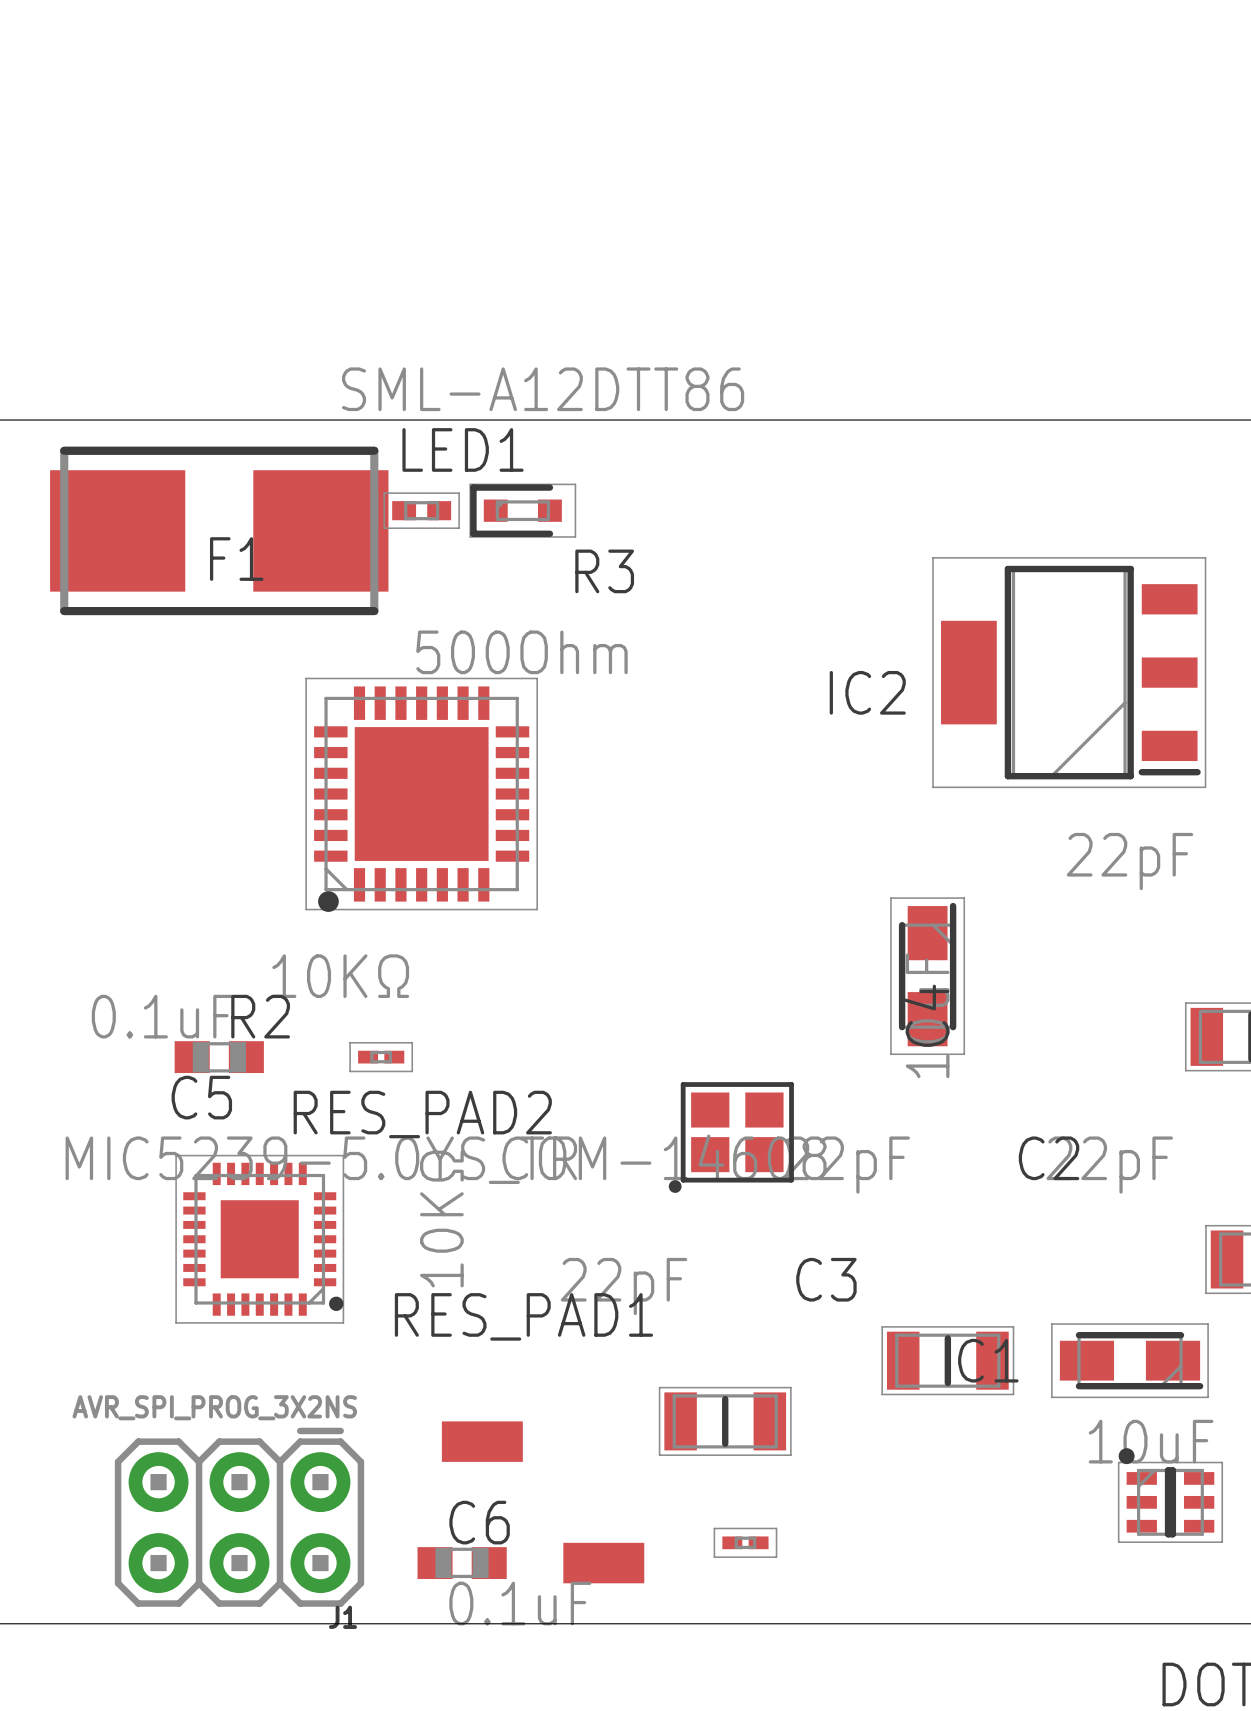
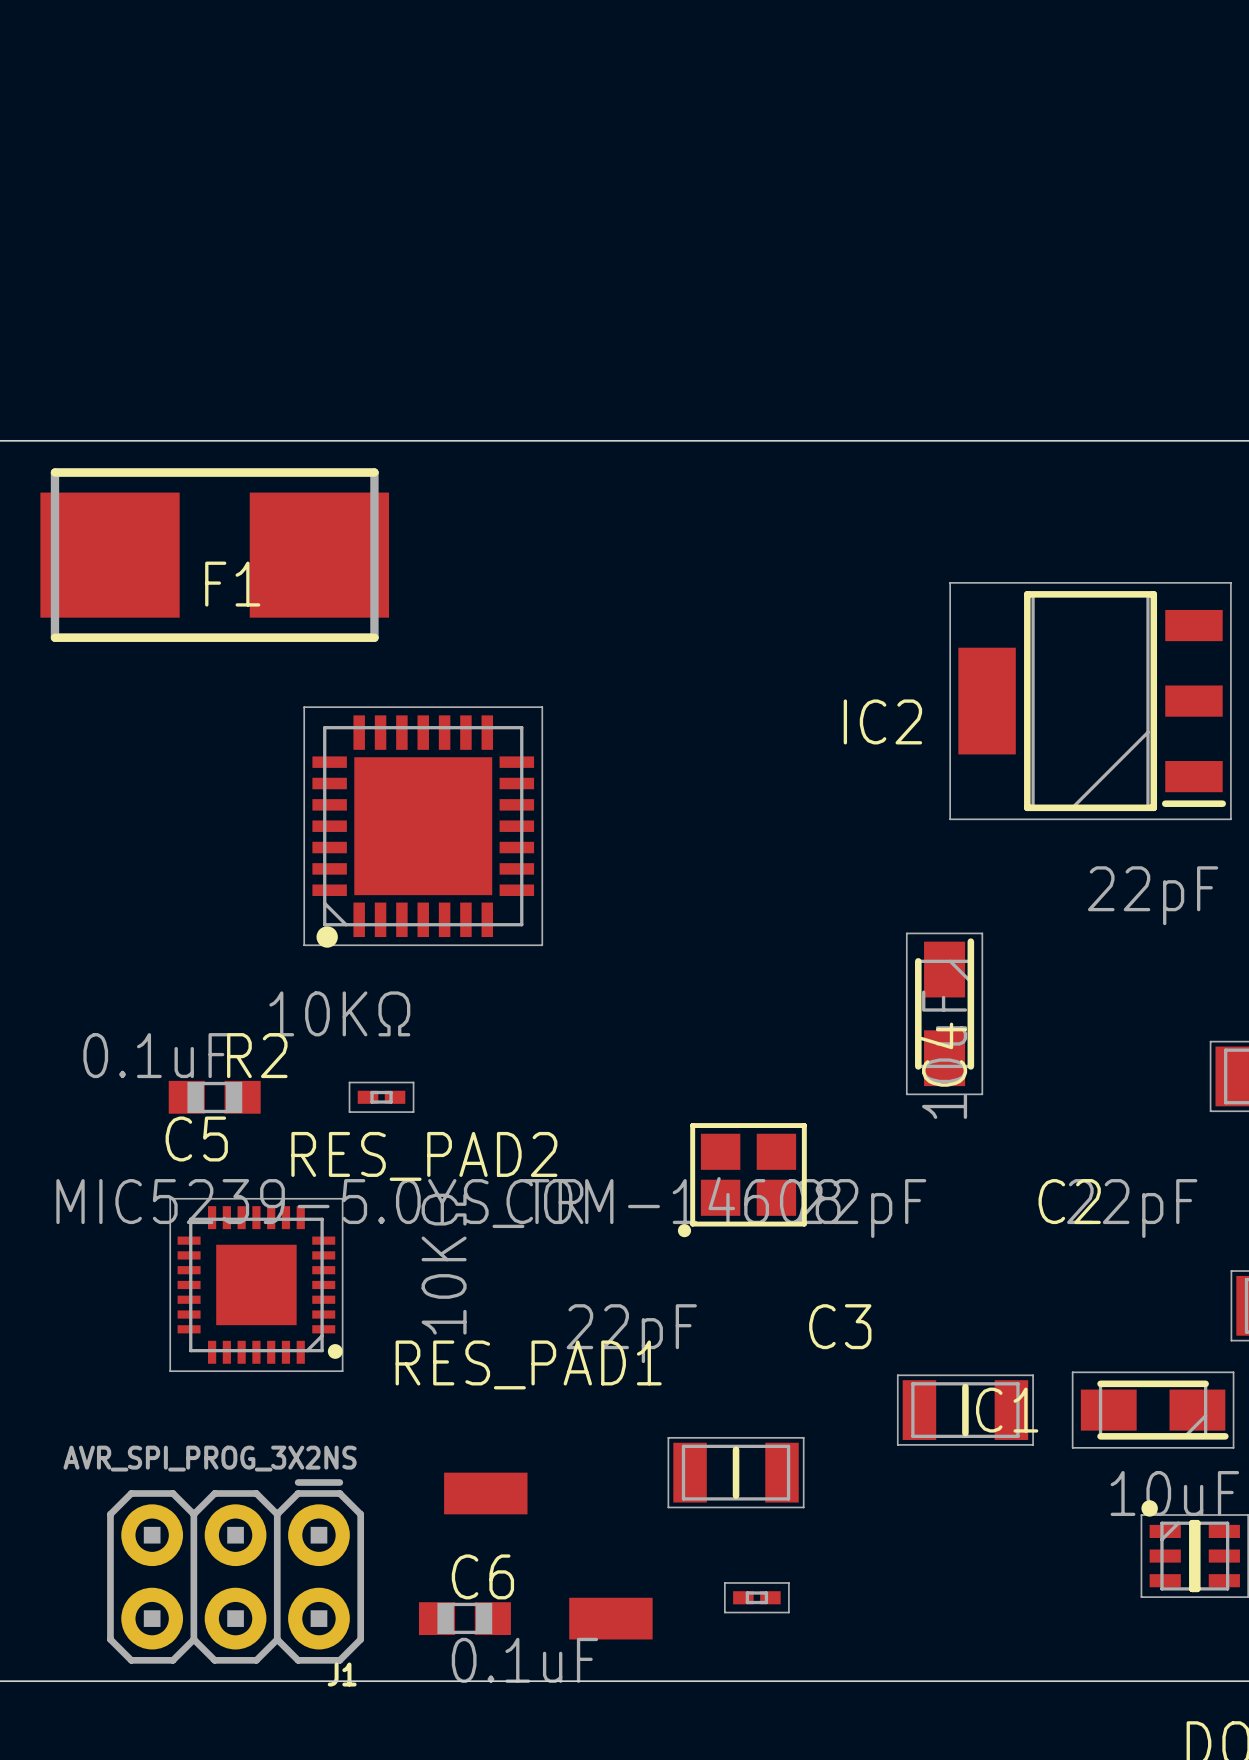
R3: 500Ohm (421, 510) -> none
LED1: SML-A12DTT86 (522, 510) -> none

